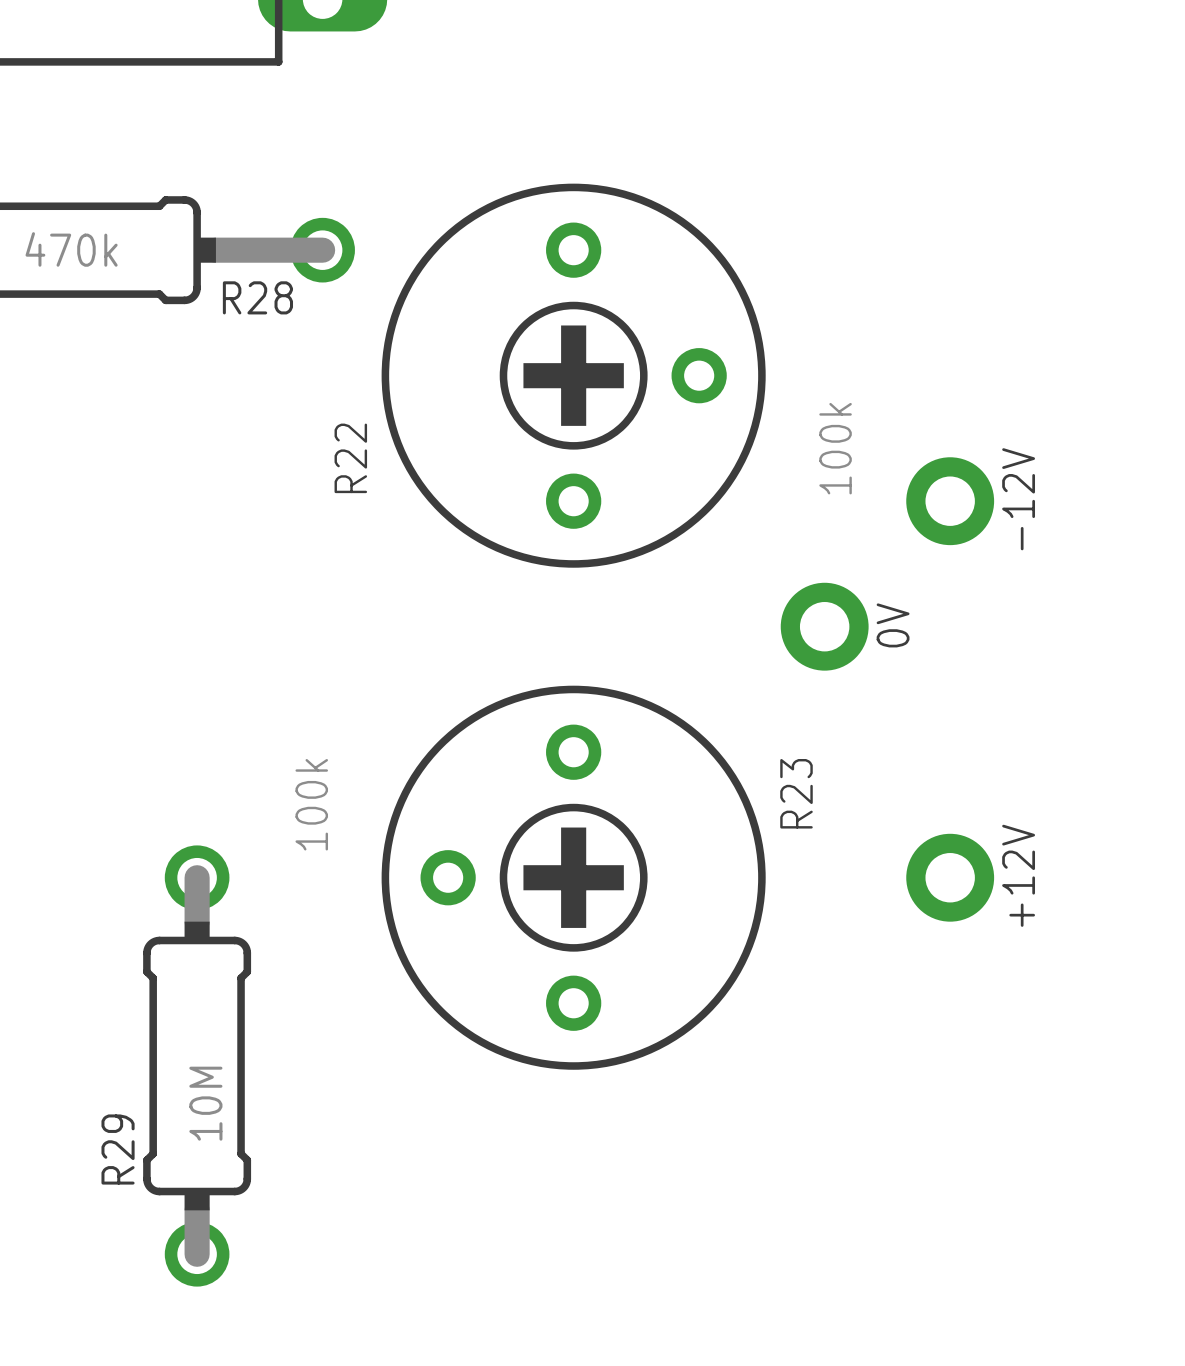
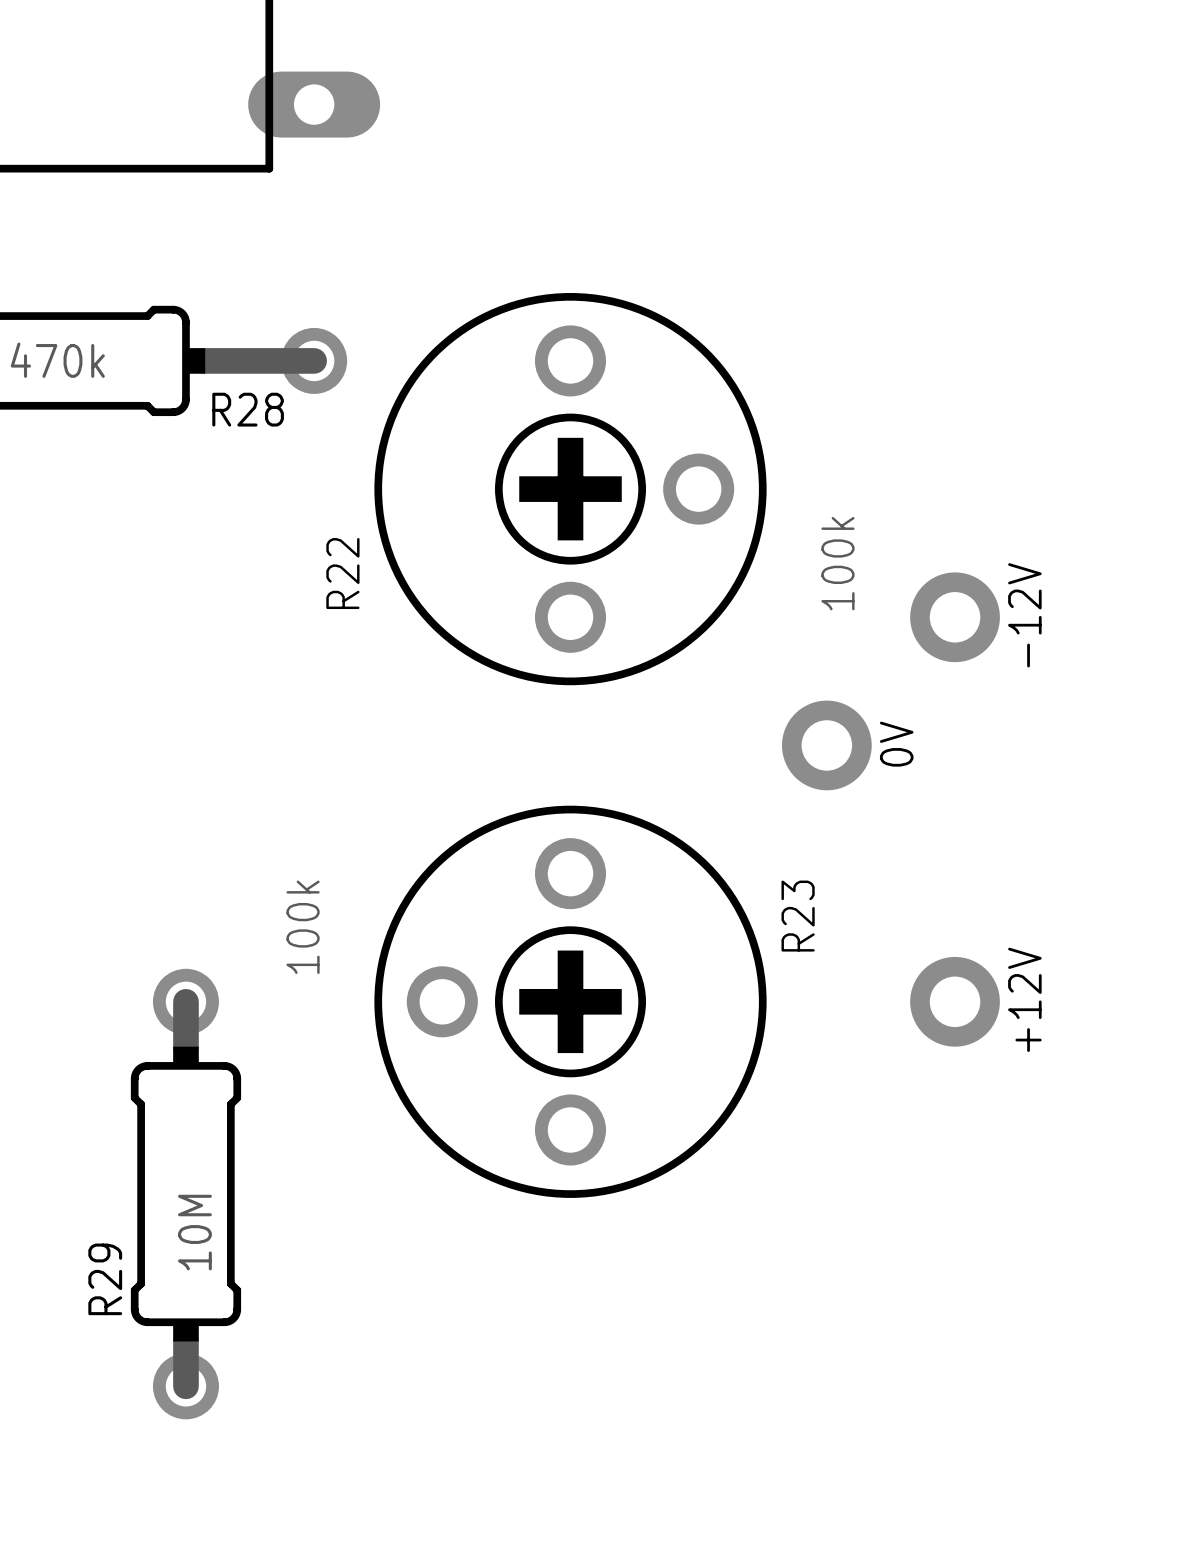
R22 footprint: [381, 183, 766, 568] -> [374, 293, 767, 686]
R23 footprint: [381, 685, 766, 1070] -> [374, 805, 767, 1198]

